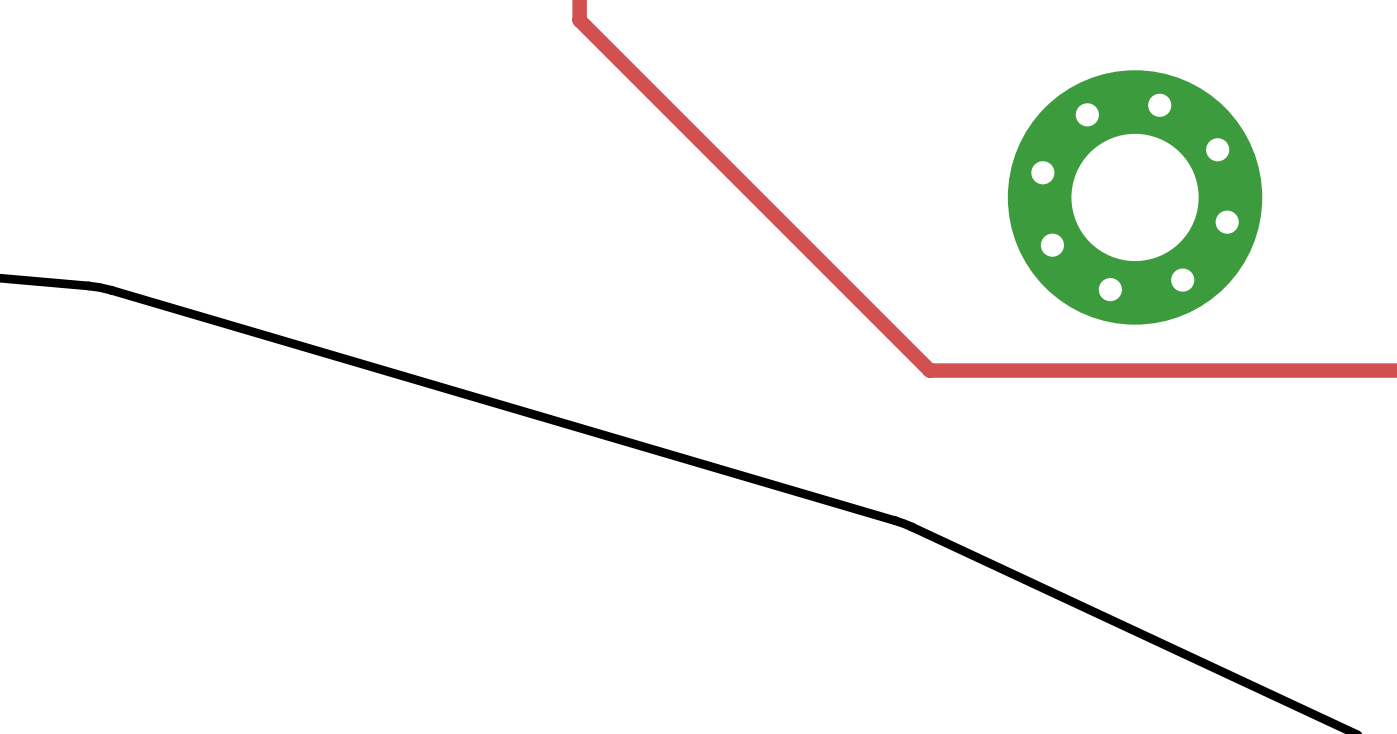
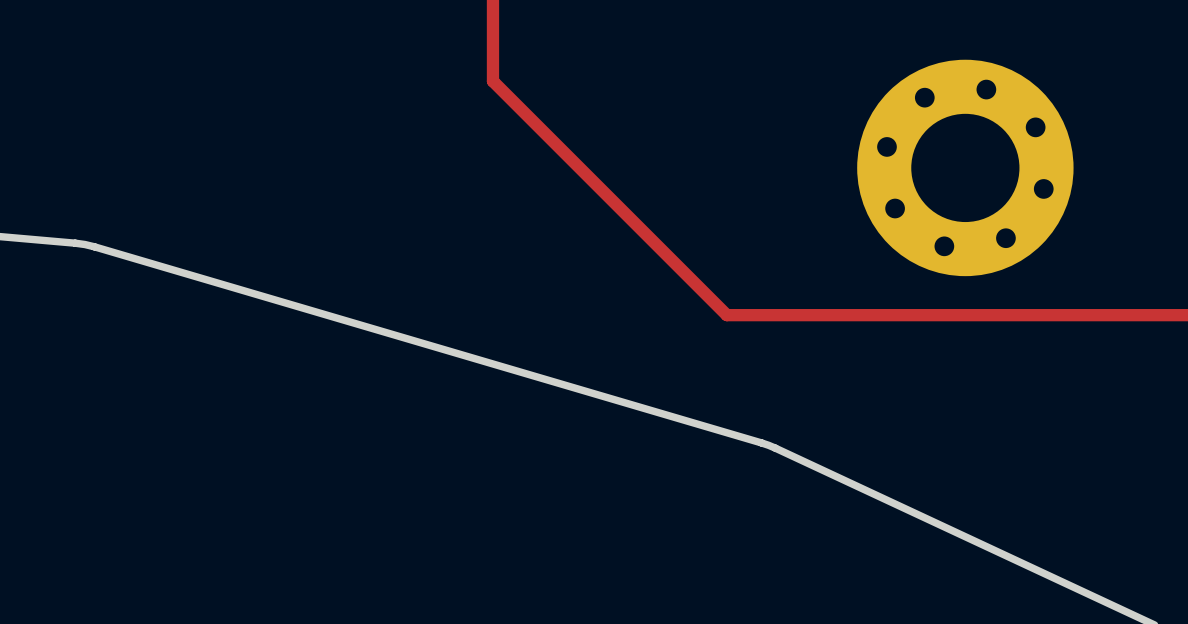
track: (579, 20) (929, 370) -> (492, 17) (492, 81) (726, 315) (790, 315)

